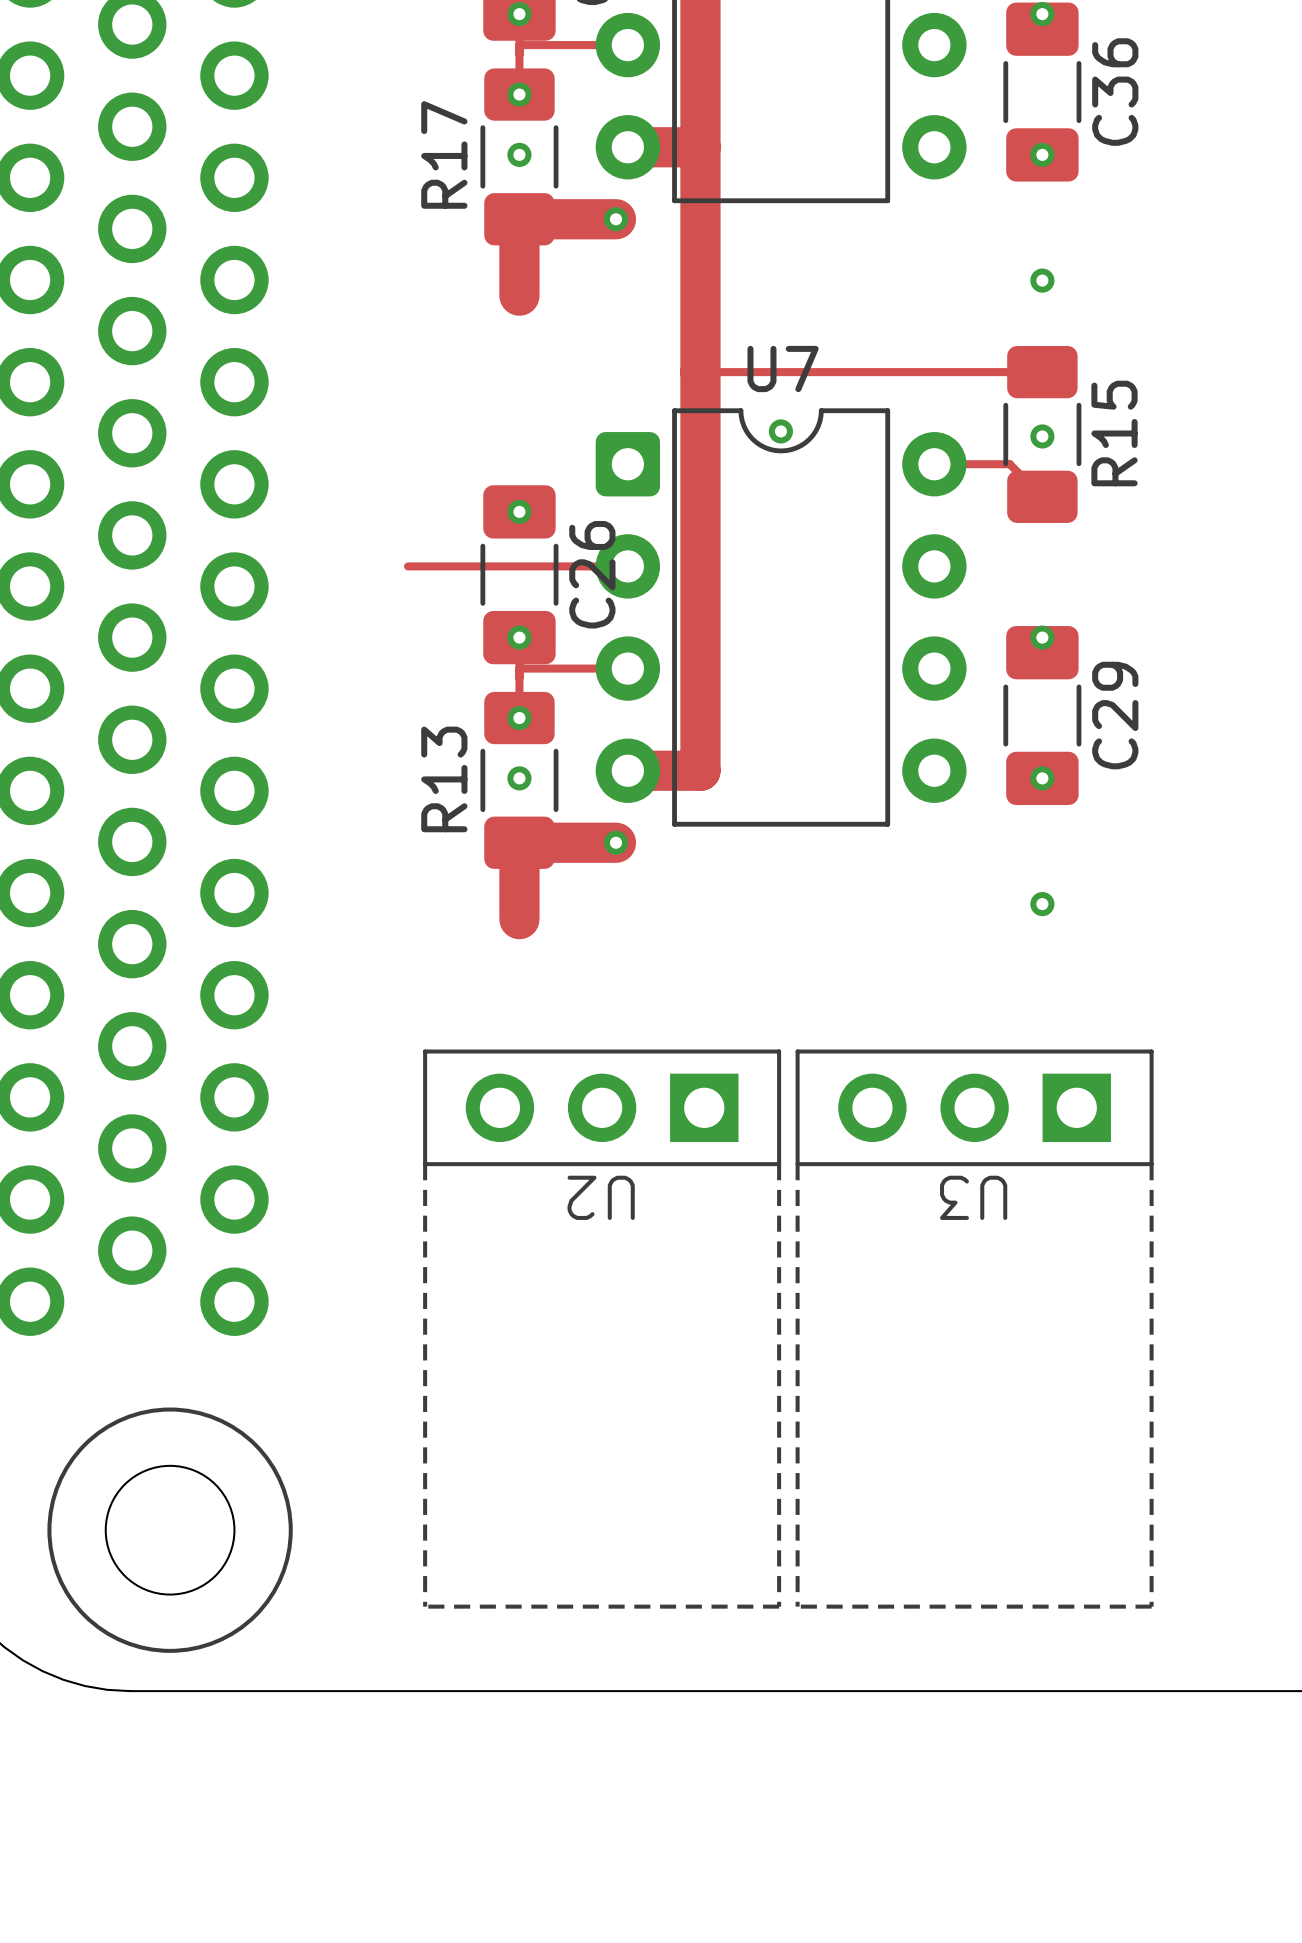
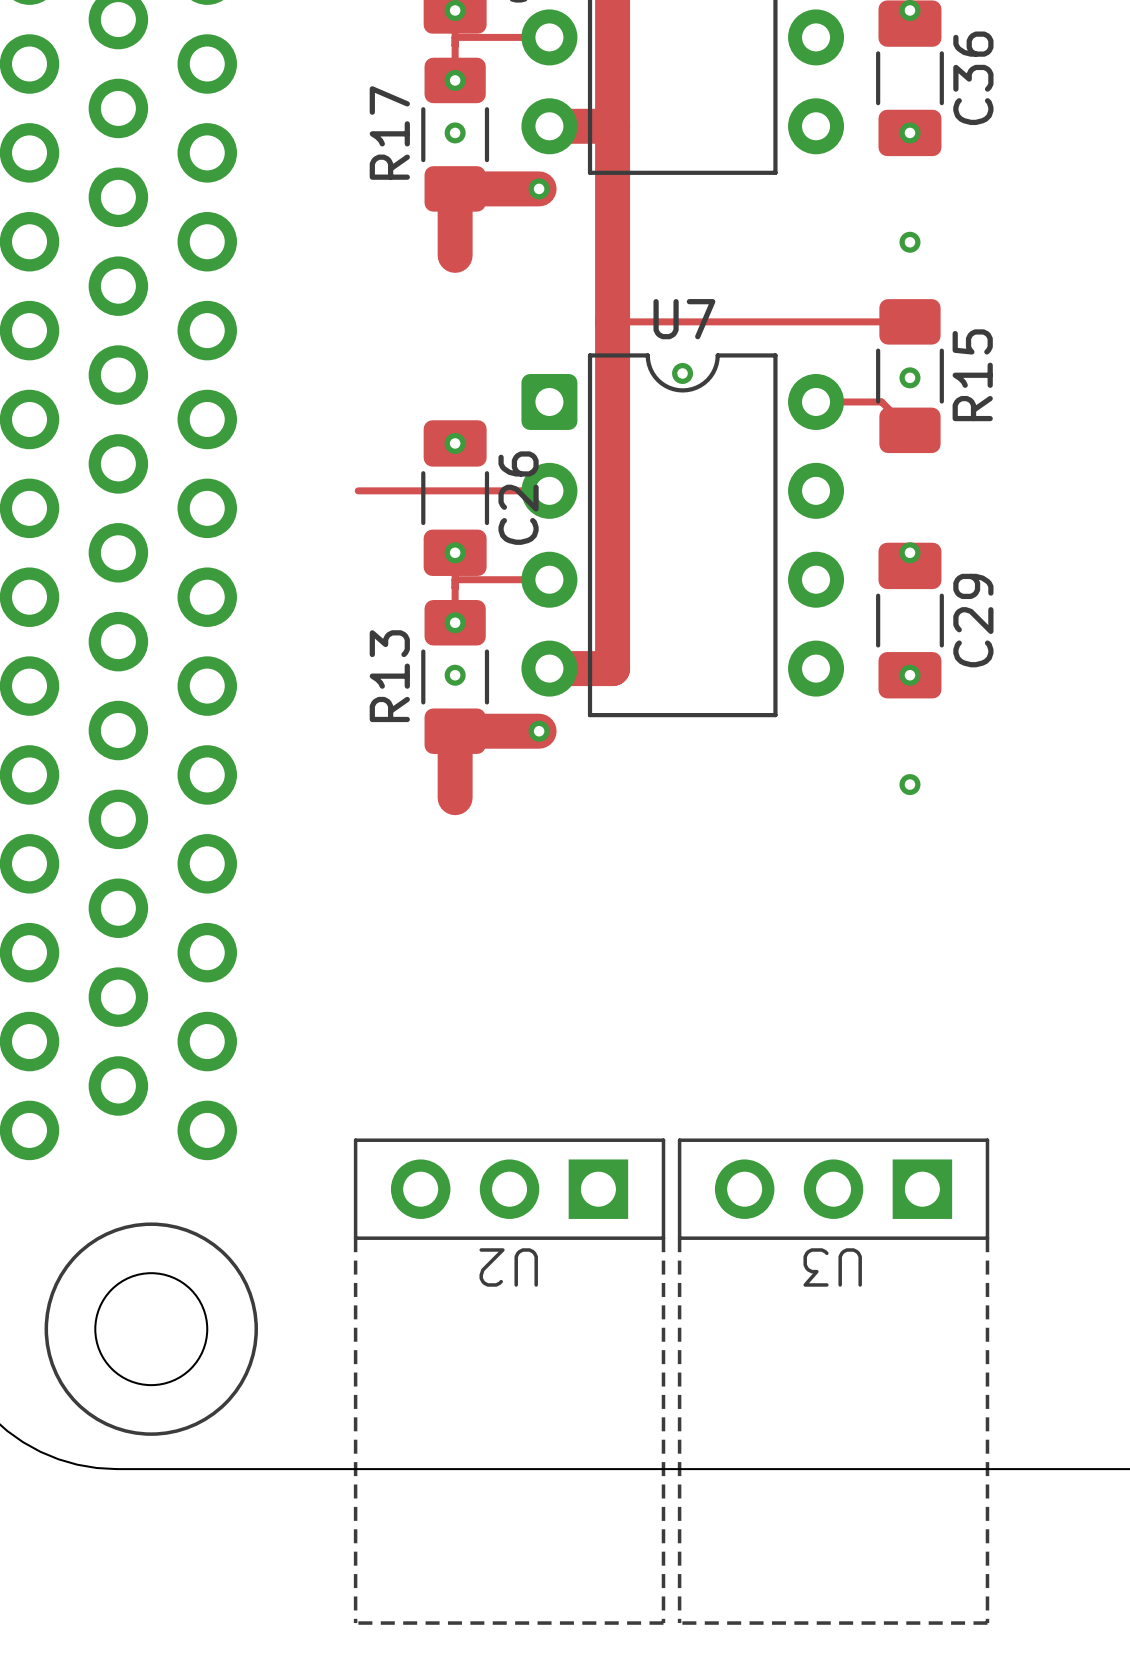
U2 position: (602, 1329) -> (509, 1381)
U3 position: (974, 1329) -> (833, 1381)

